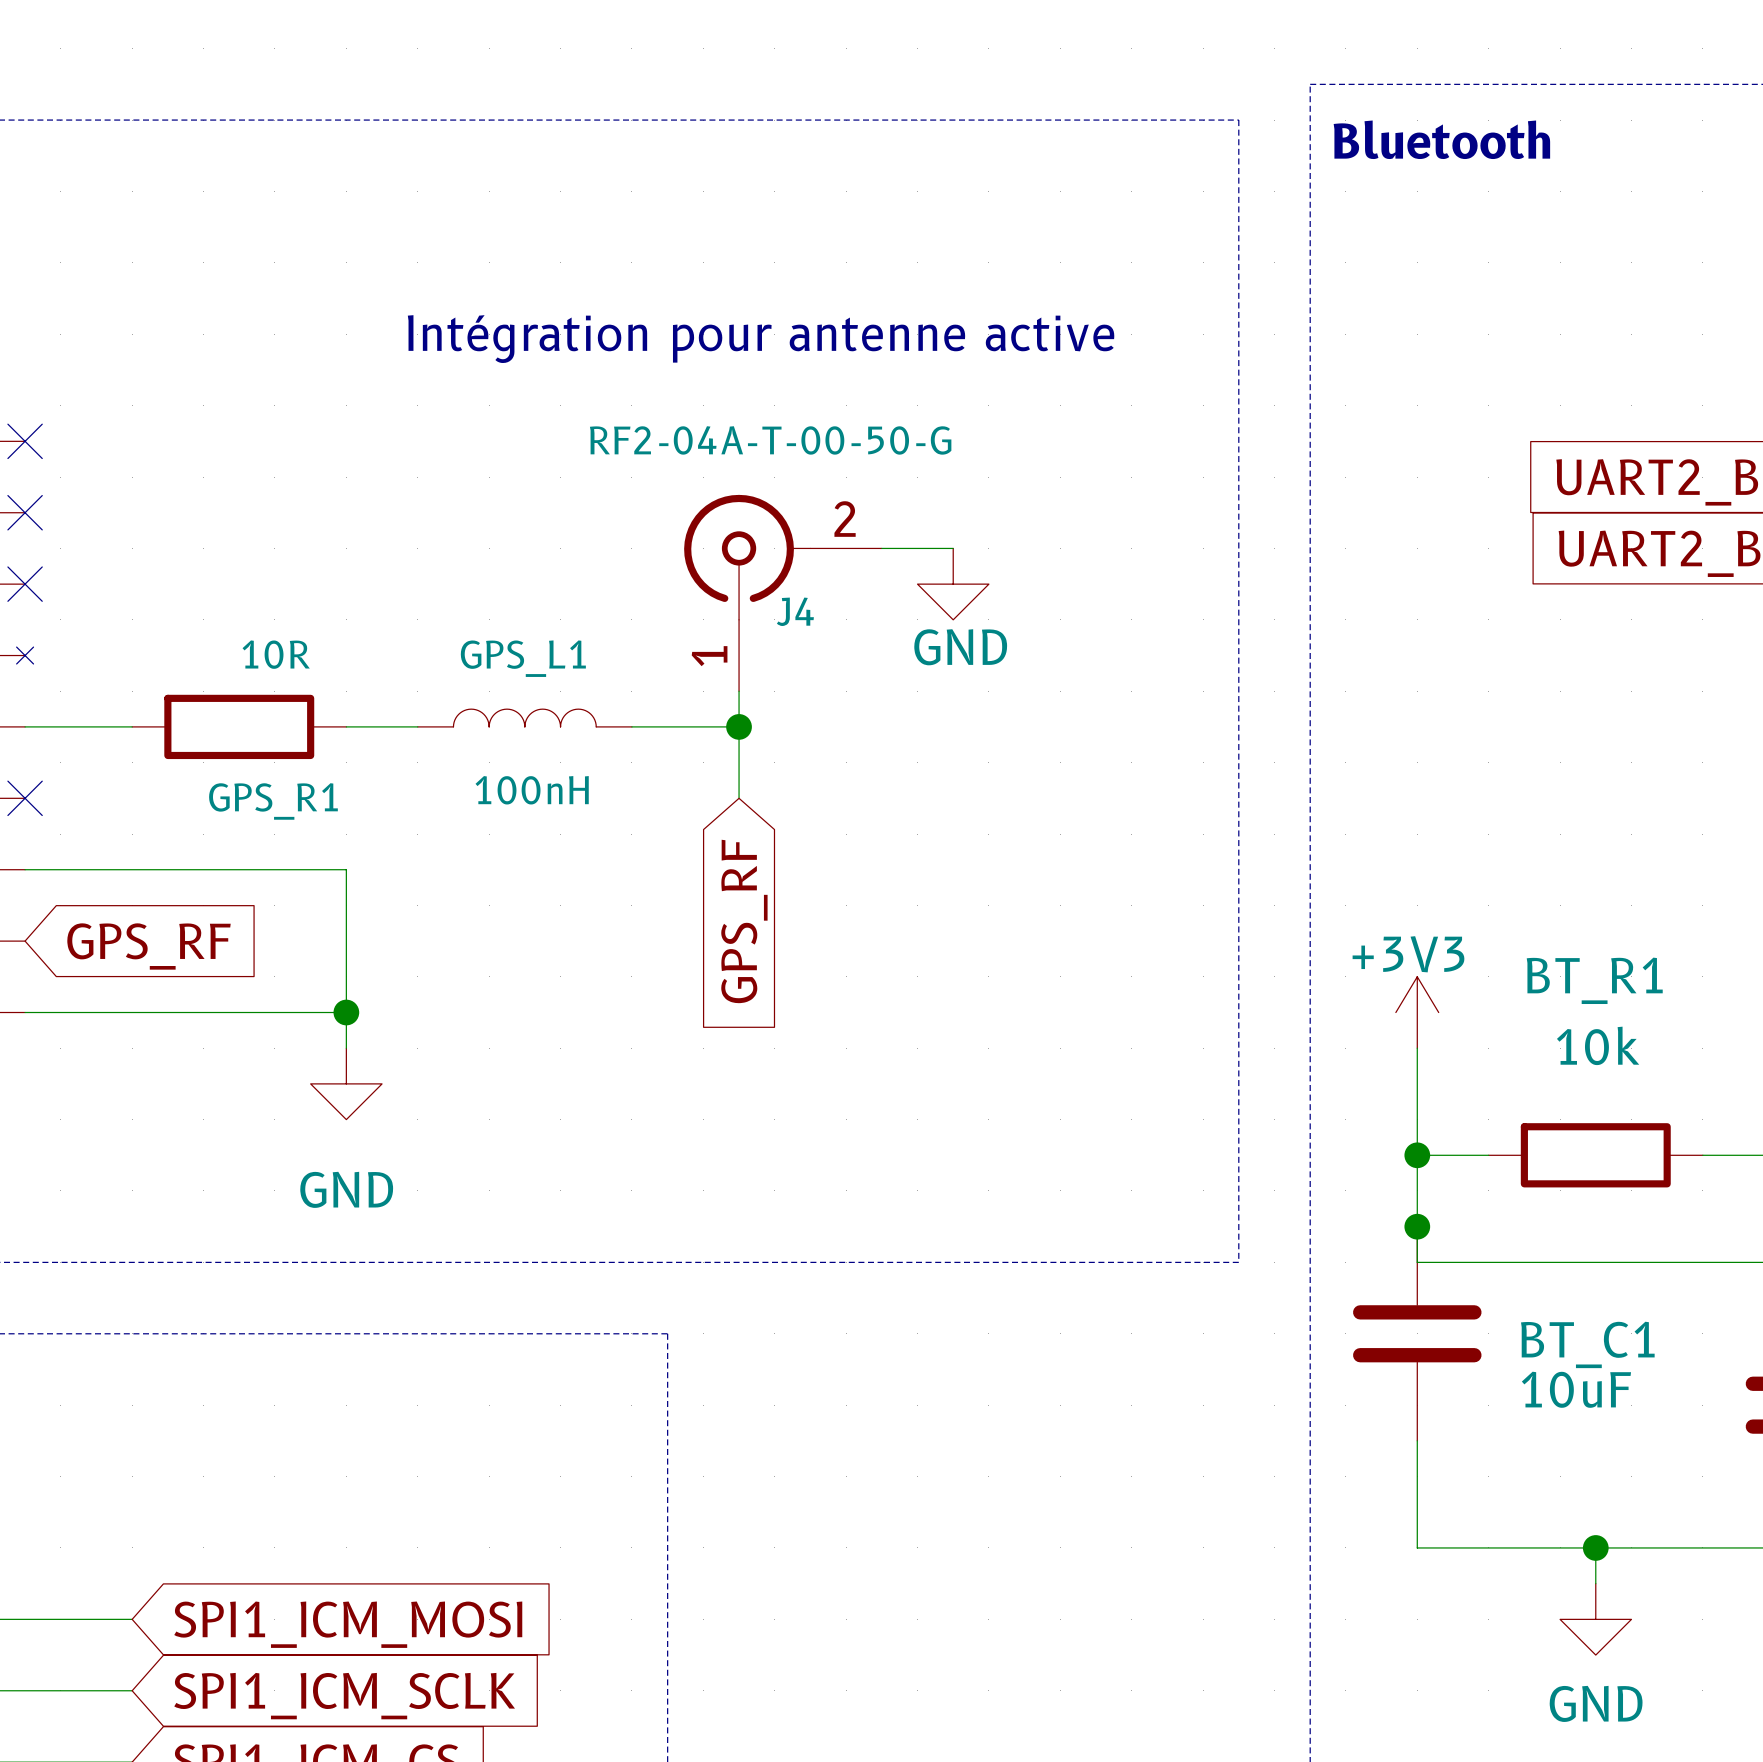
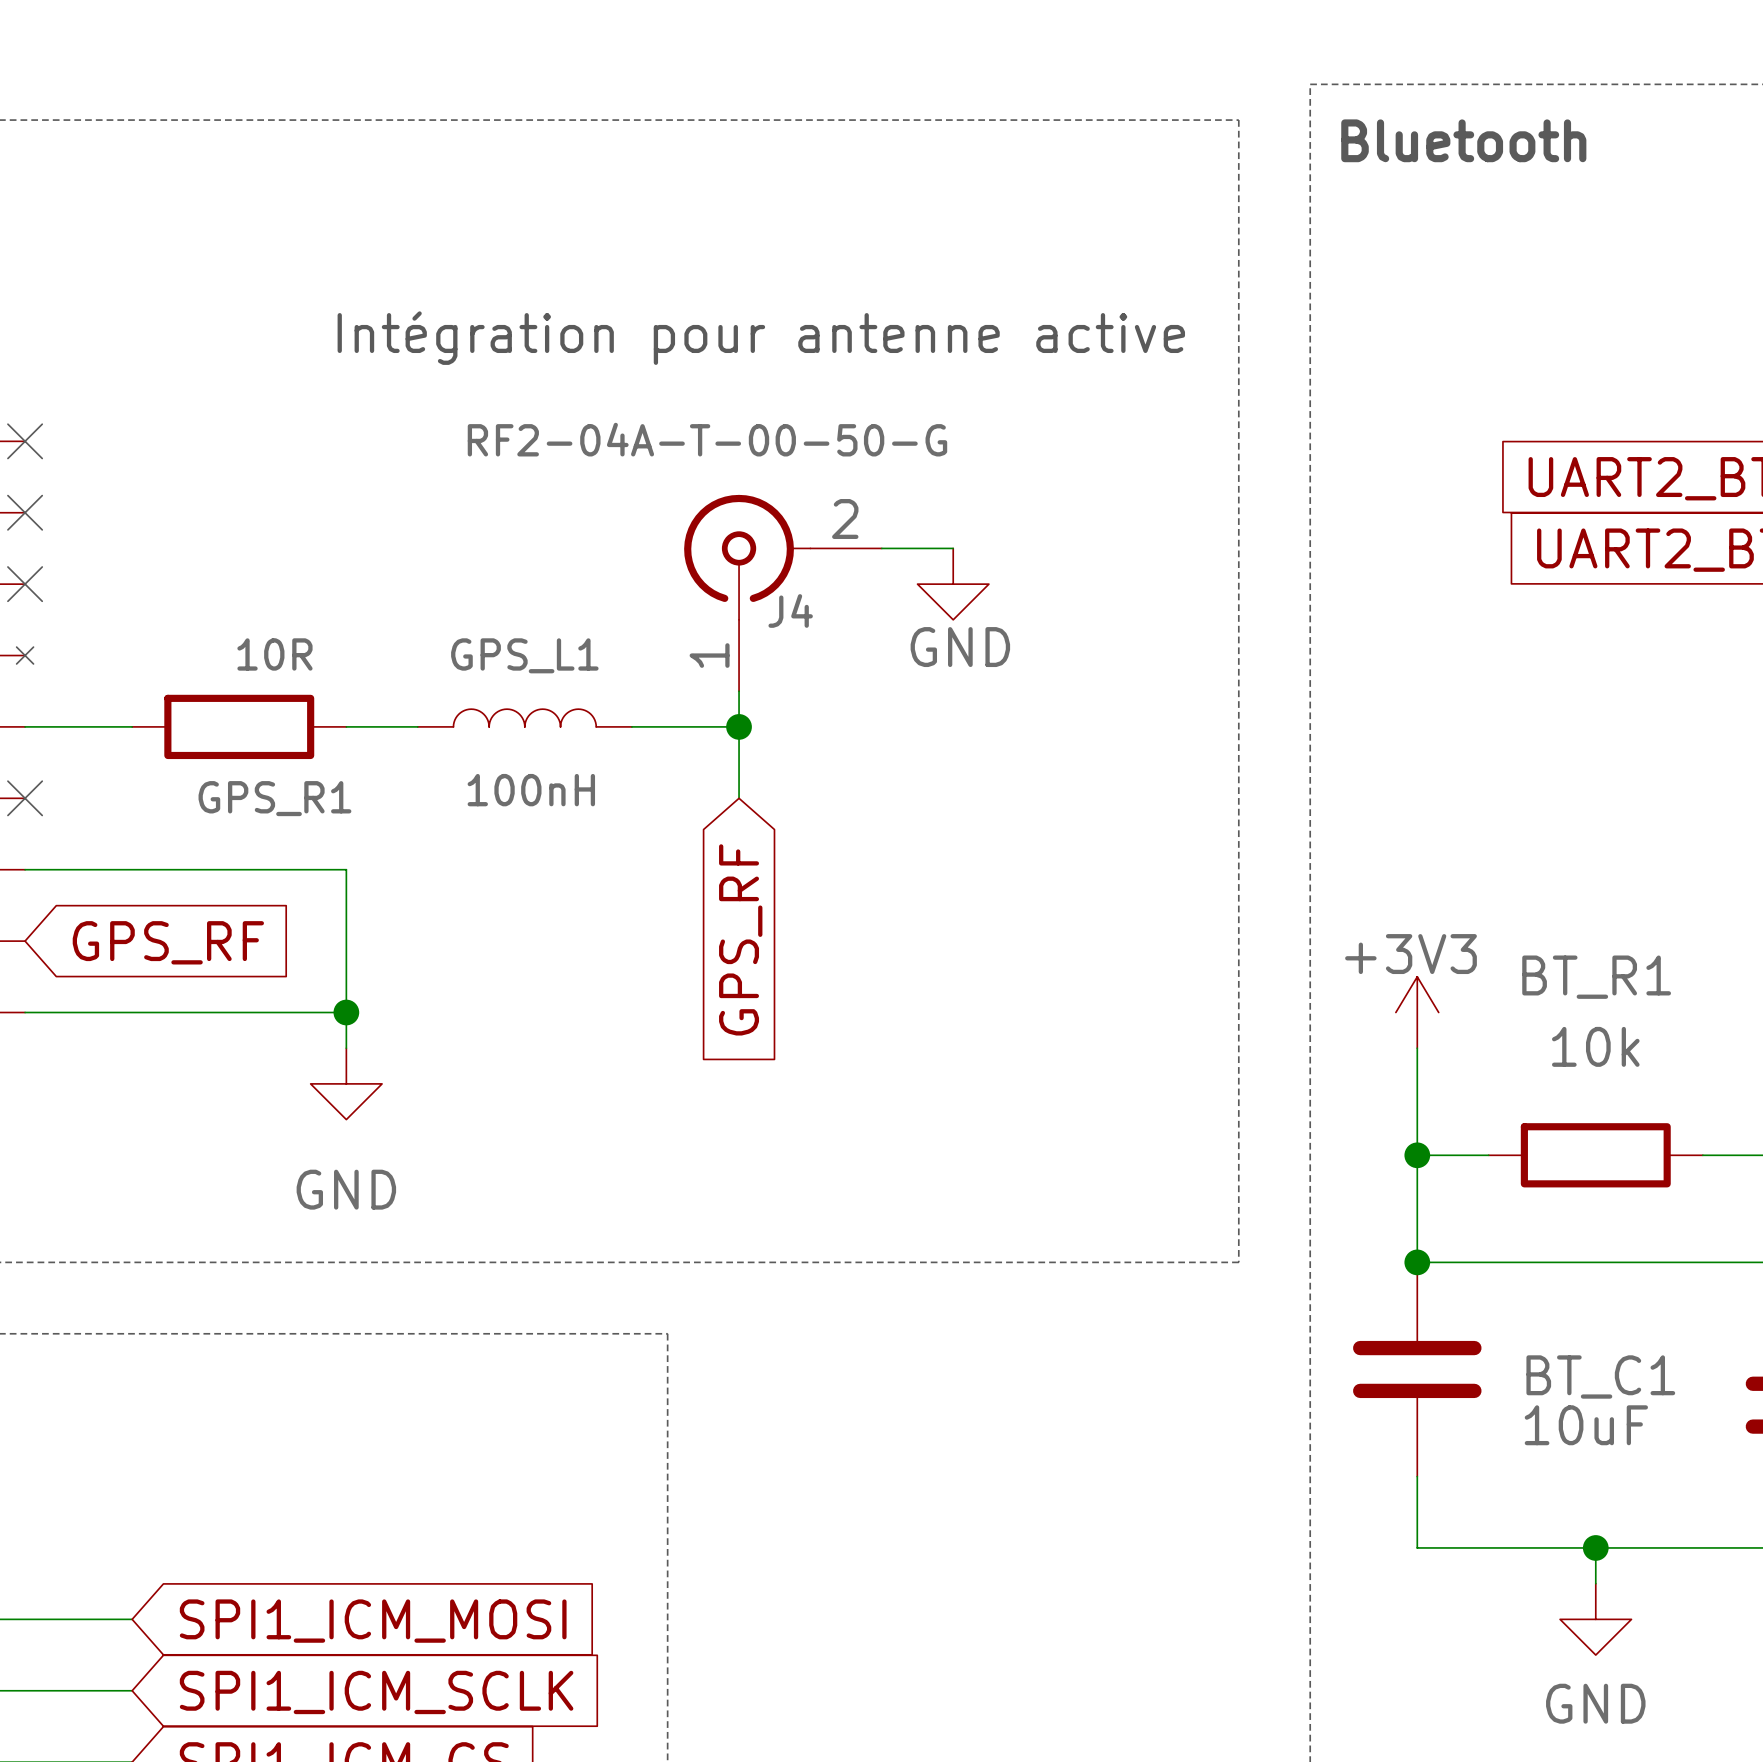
junction position: (1417, 1226) -> (1417, 1262)
BT_C1 position: (1417, 1333) -> (1417, 1369)

